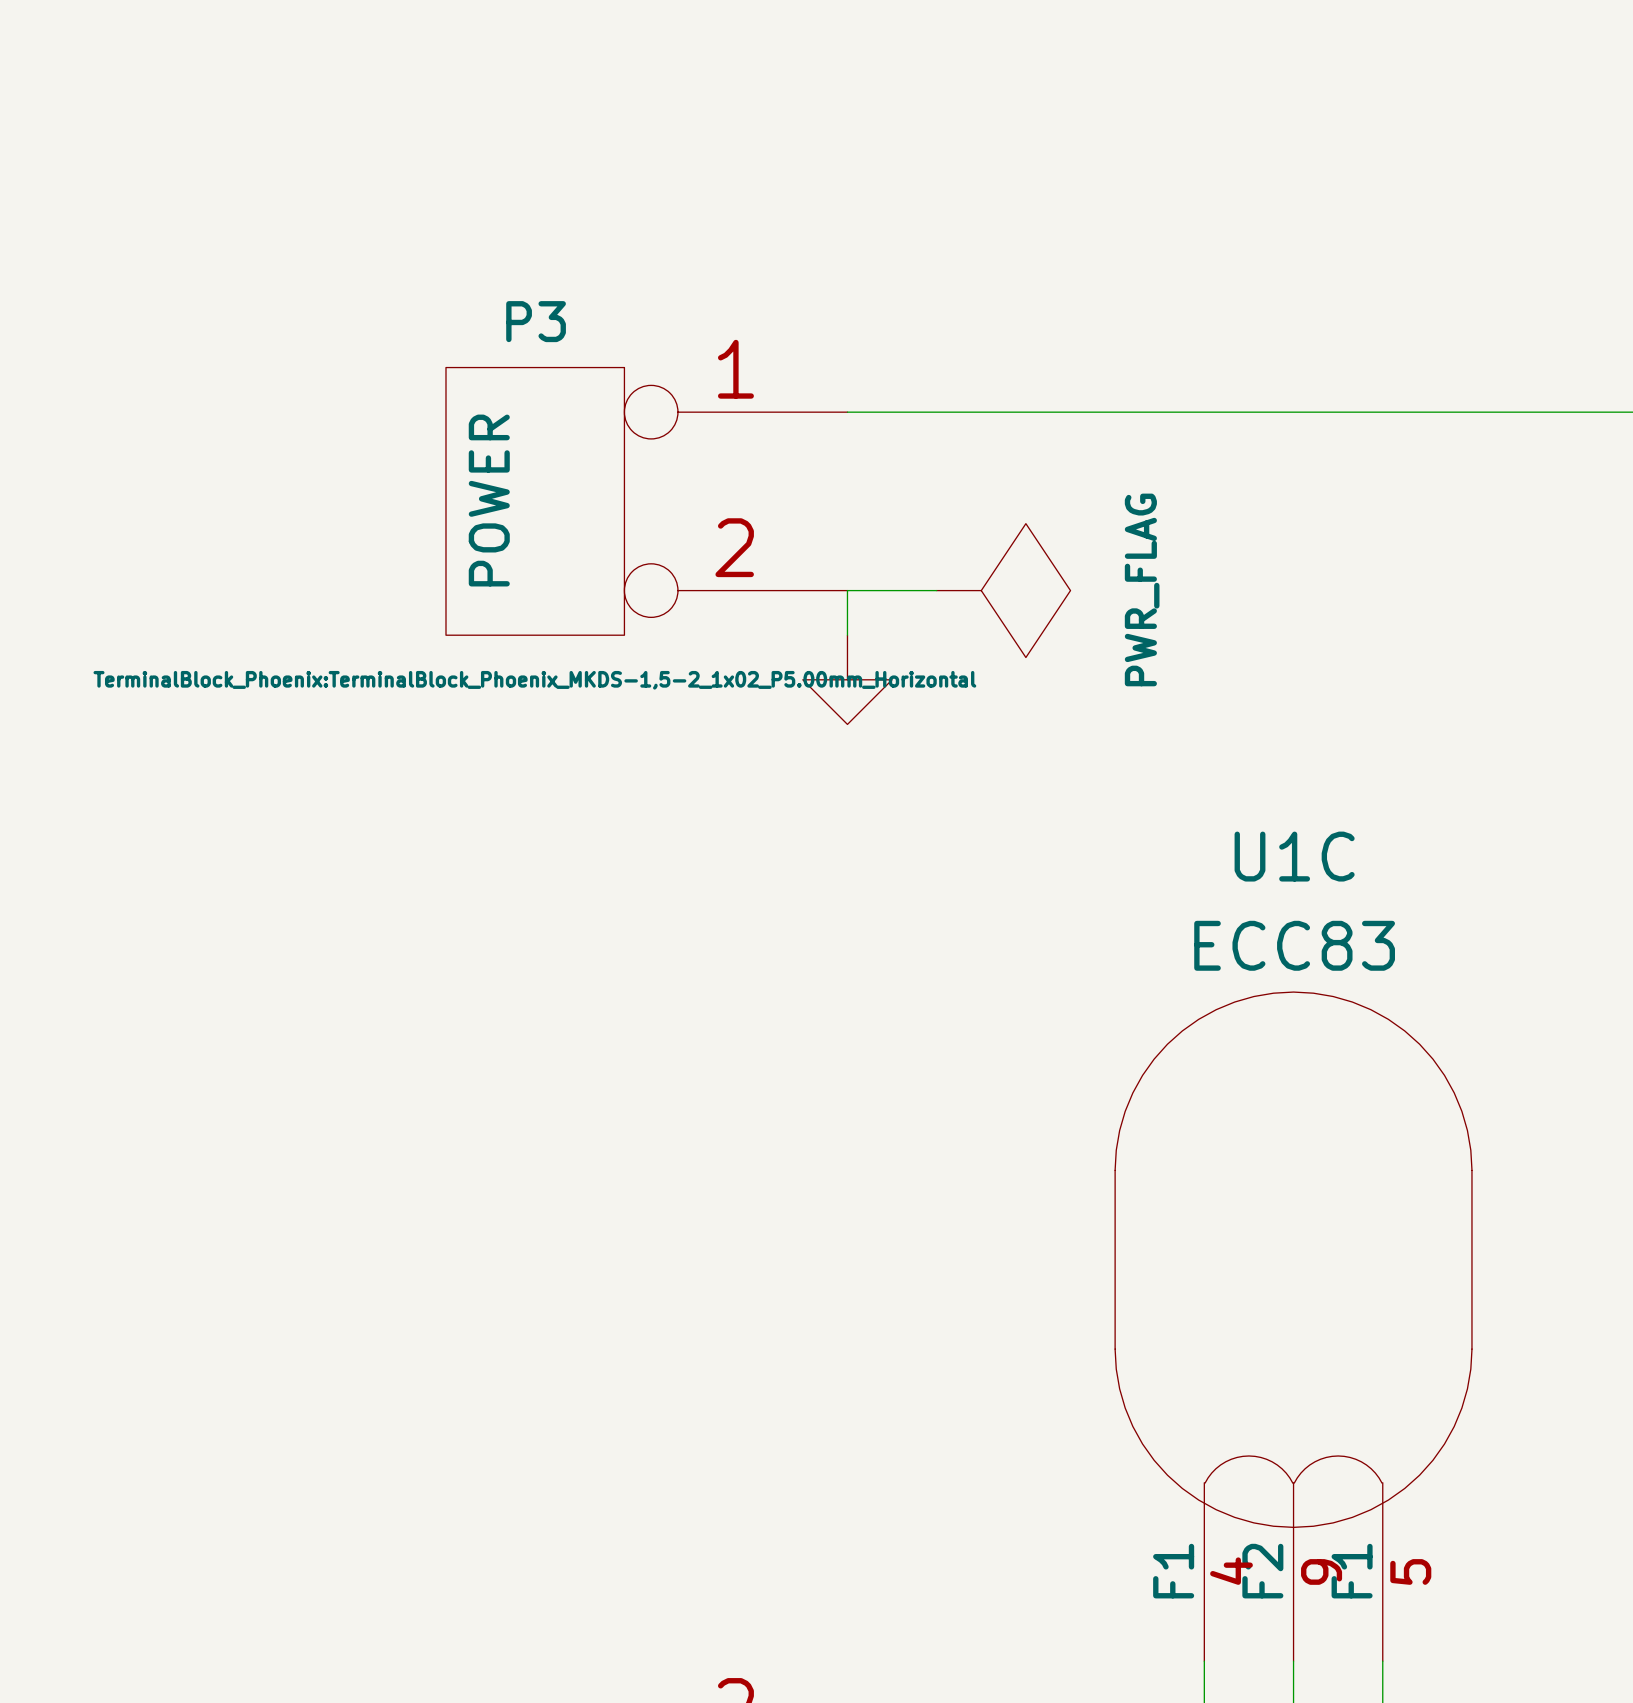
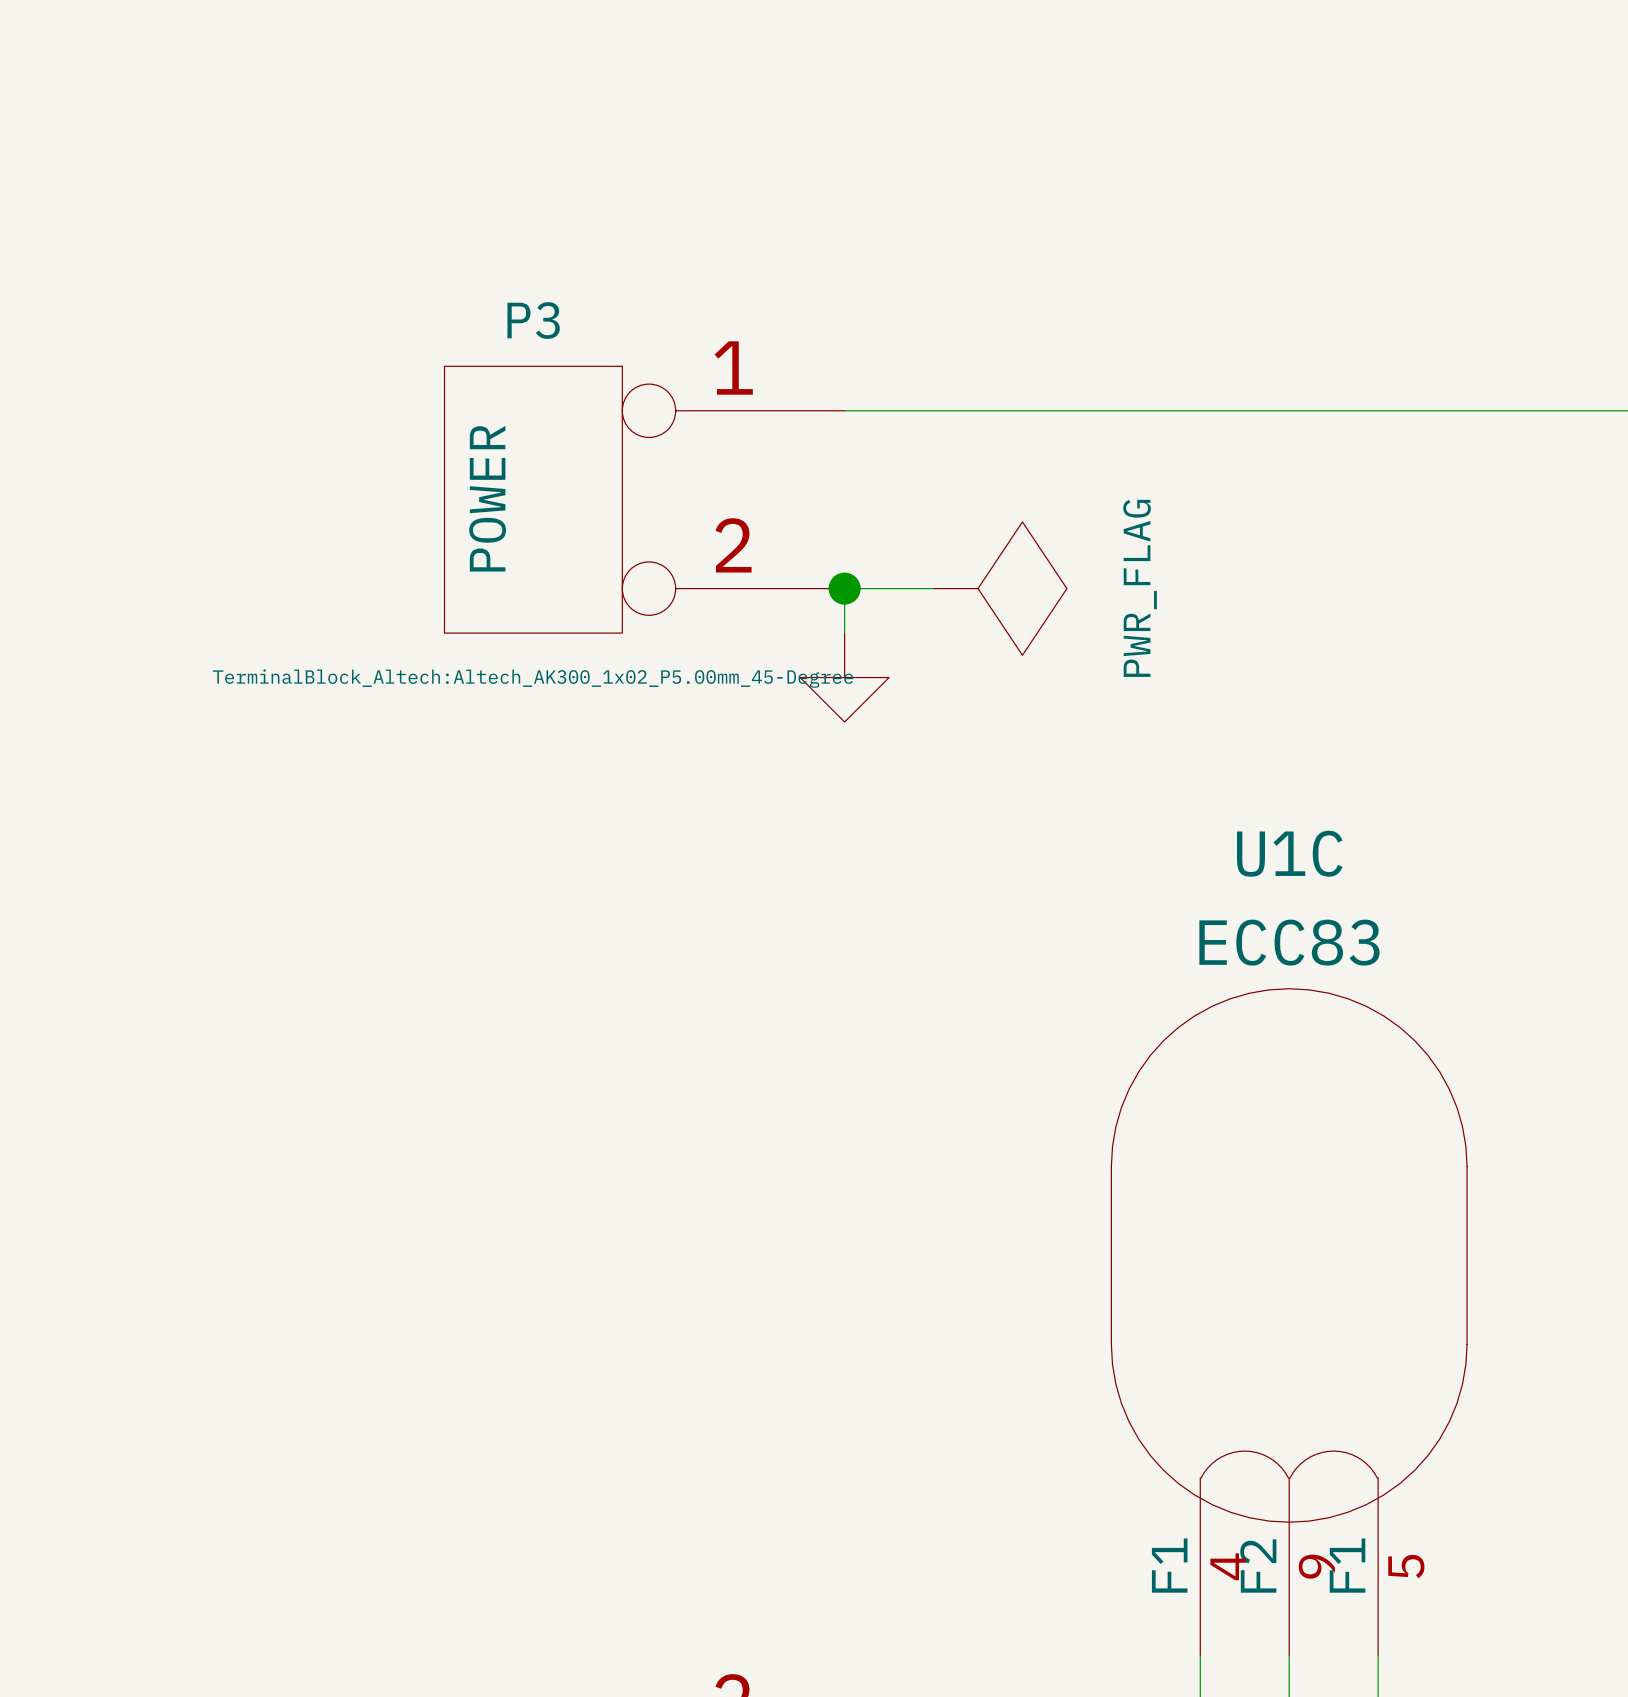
junction: none -> (844, 588)
P3 text: TerminalBlock_Phoenix:TerminalBlock_Phoenix_MKDS-1,5-2_1x02_P5.00mm_Horizontal (534, 680) -> TerminalBlock_Altech:Altech_AK300_1x02_P5.00mm_45-Degree (533, 678)

